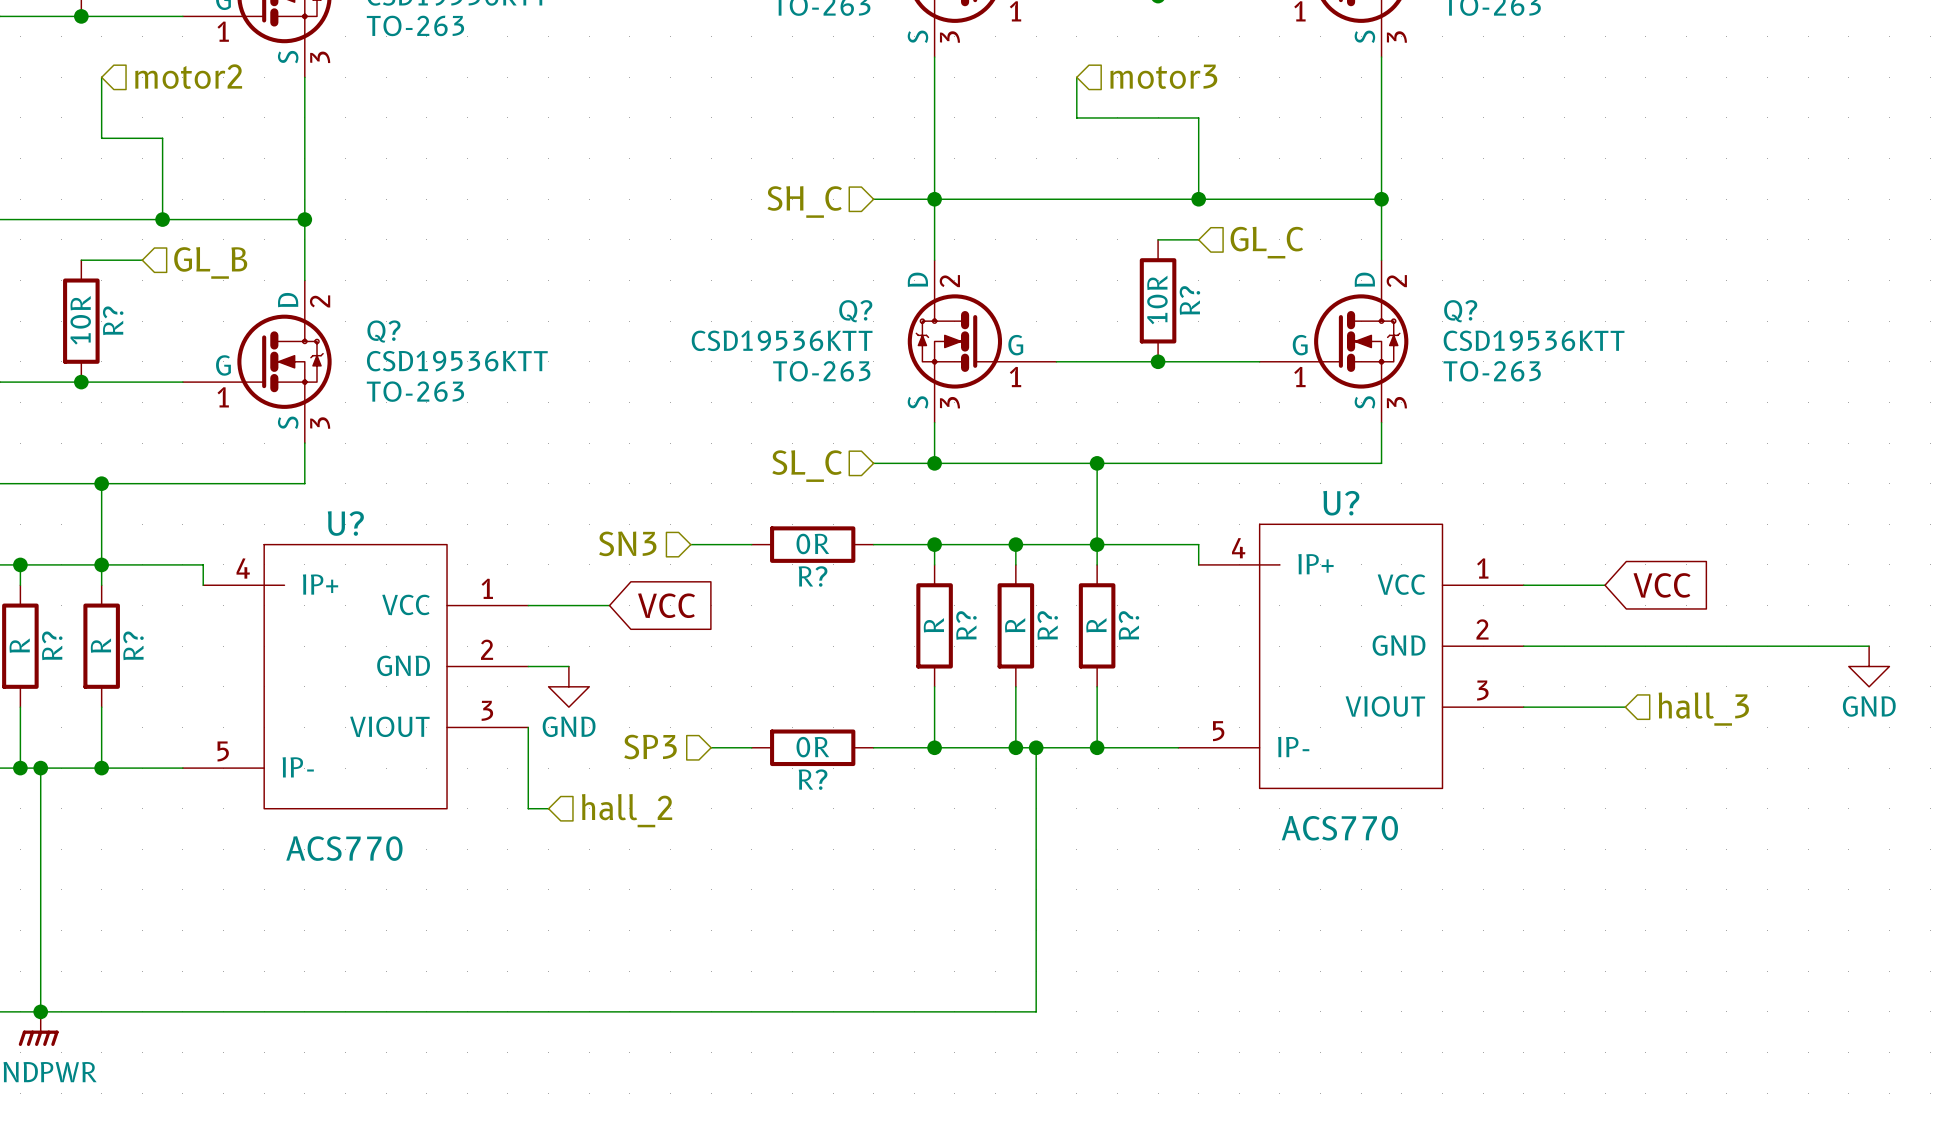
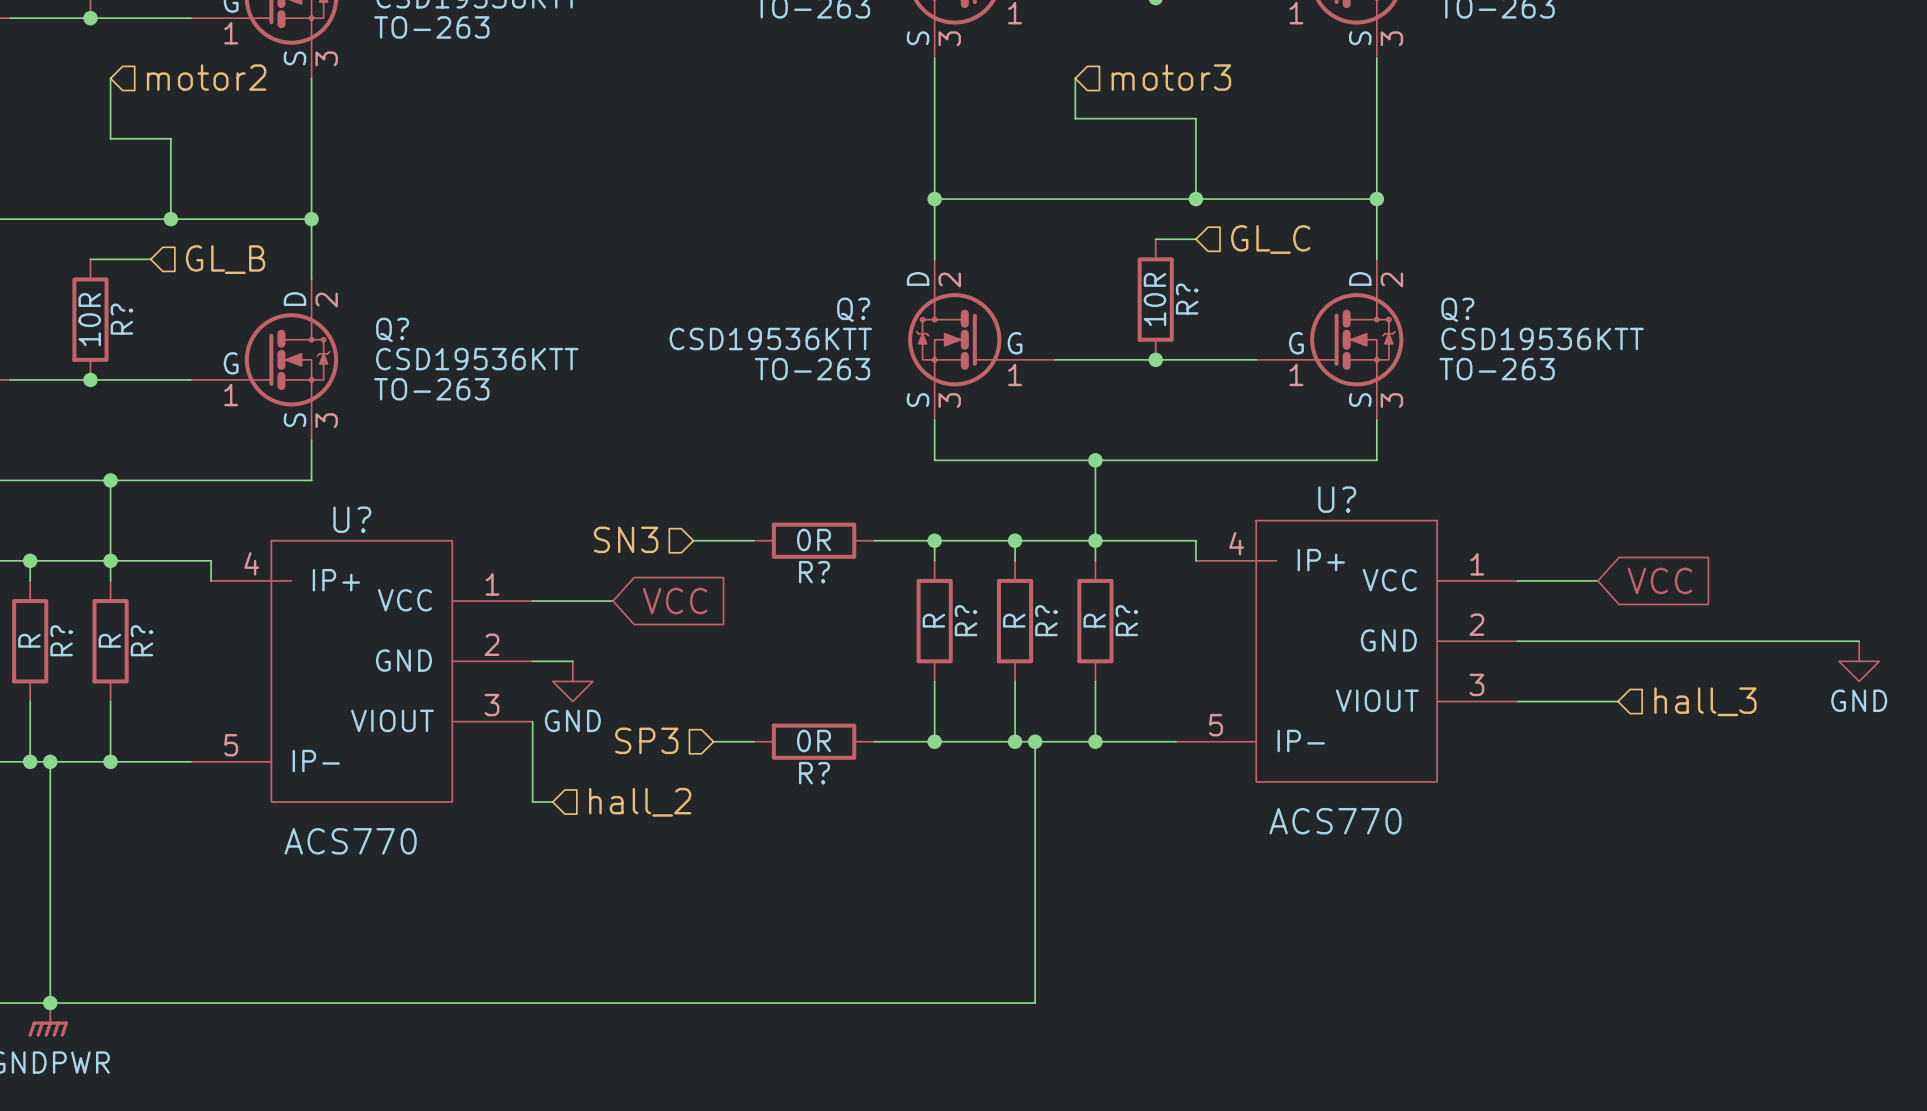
wire: (873, 199) (934, 199) -> none
hierarchical label: SH_C (804, 201) -> none
wire: (873, 463) (934, 463) -> none
junction: (934, 463) -> none
hierarchical label: SL_C (807, 466) -> none

